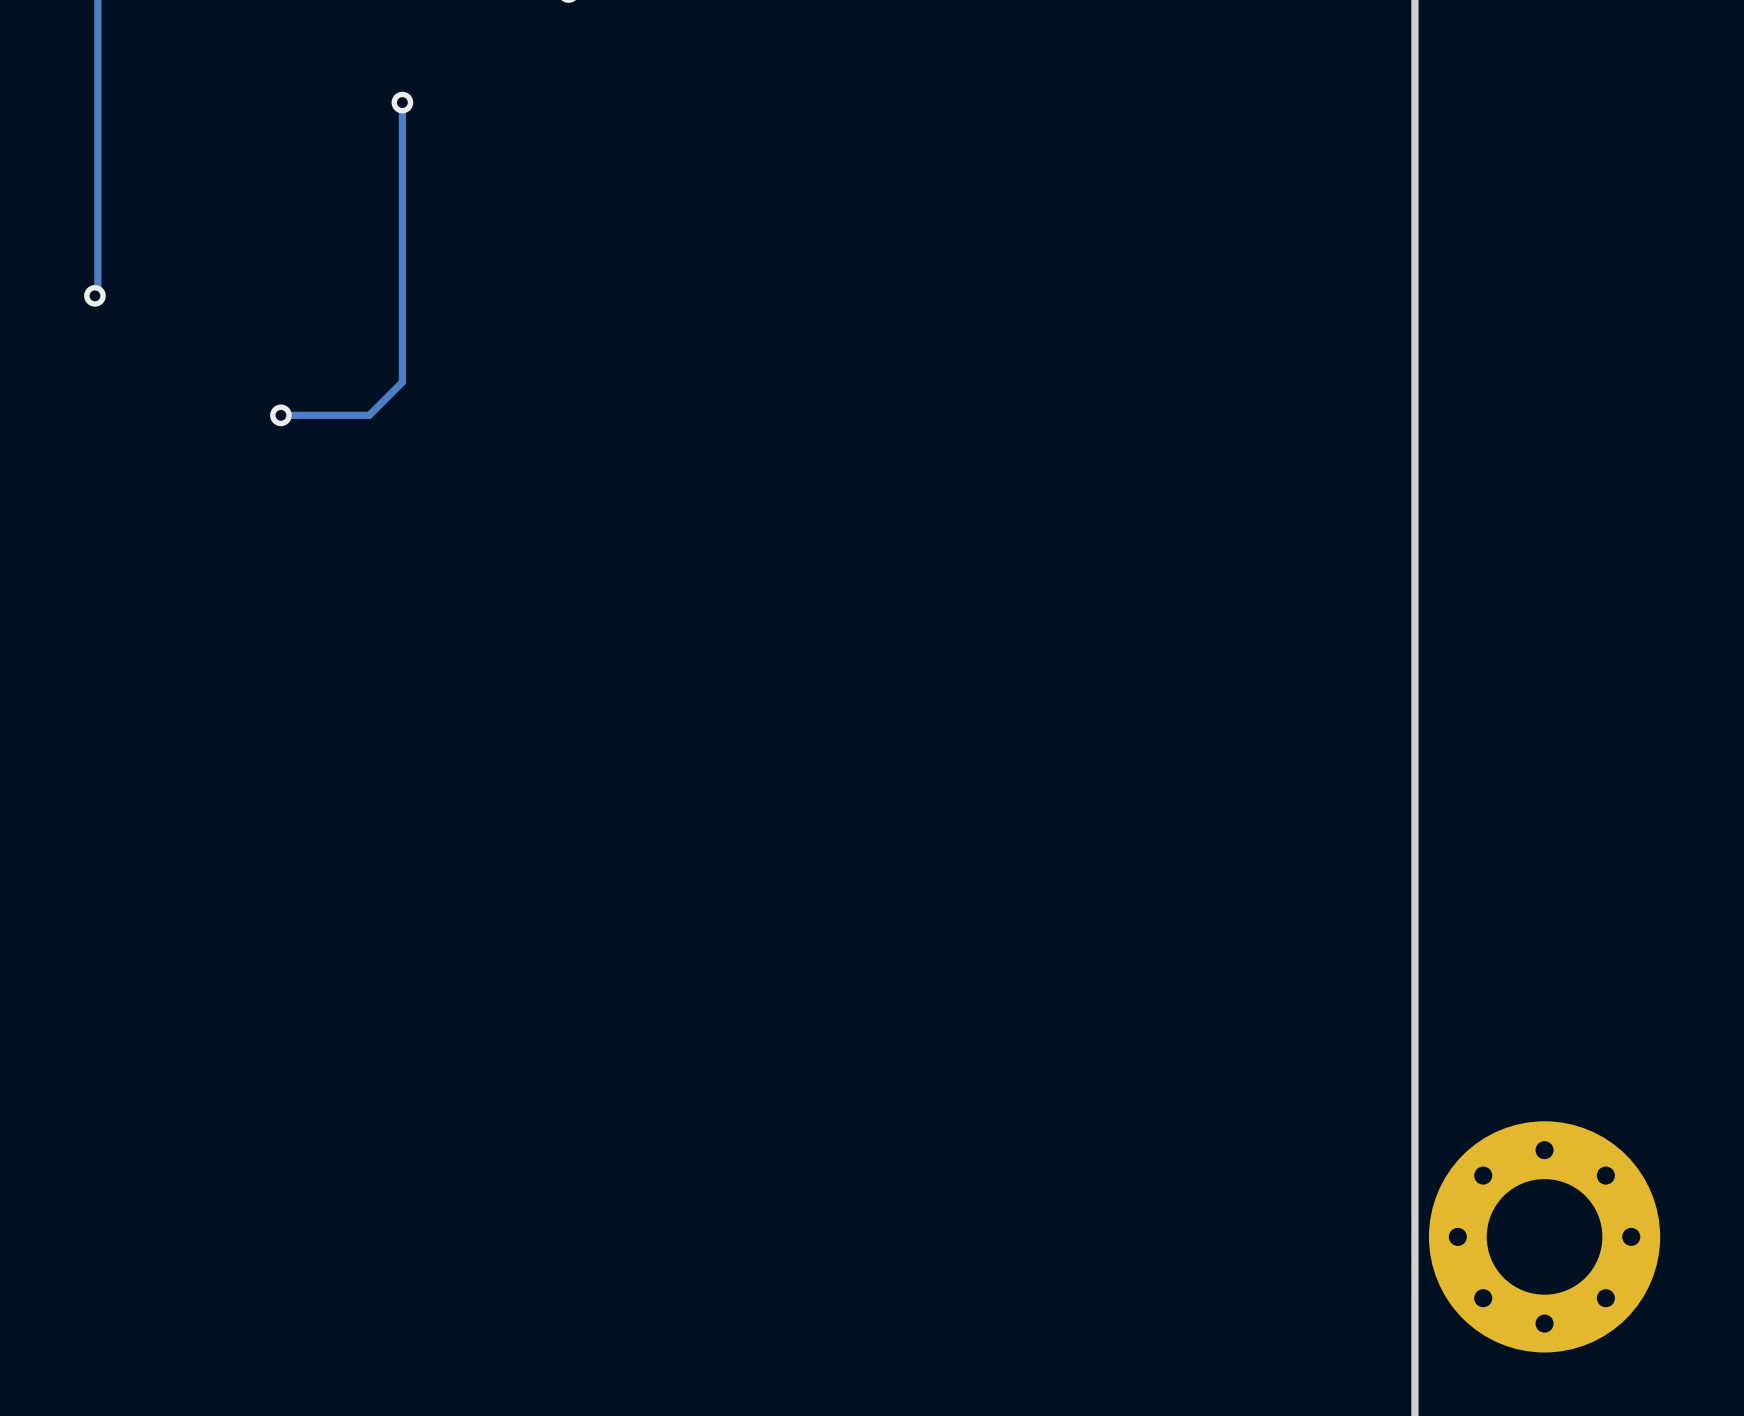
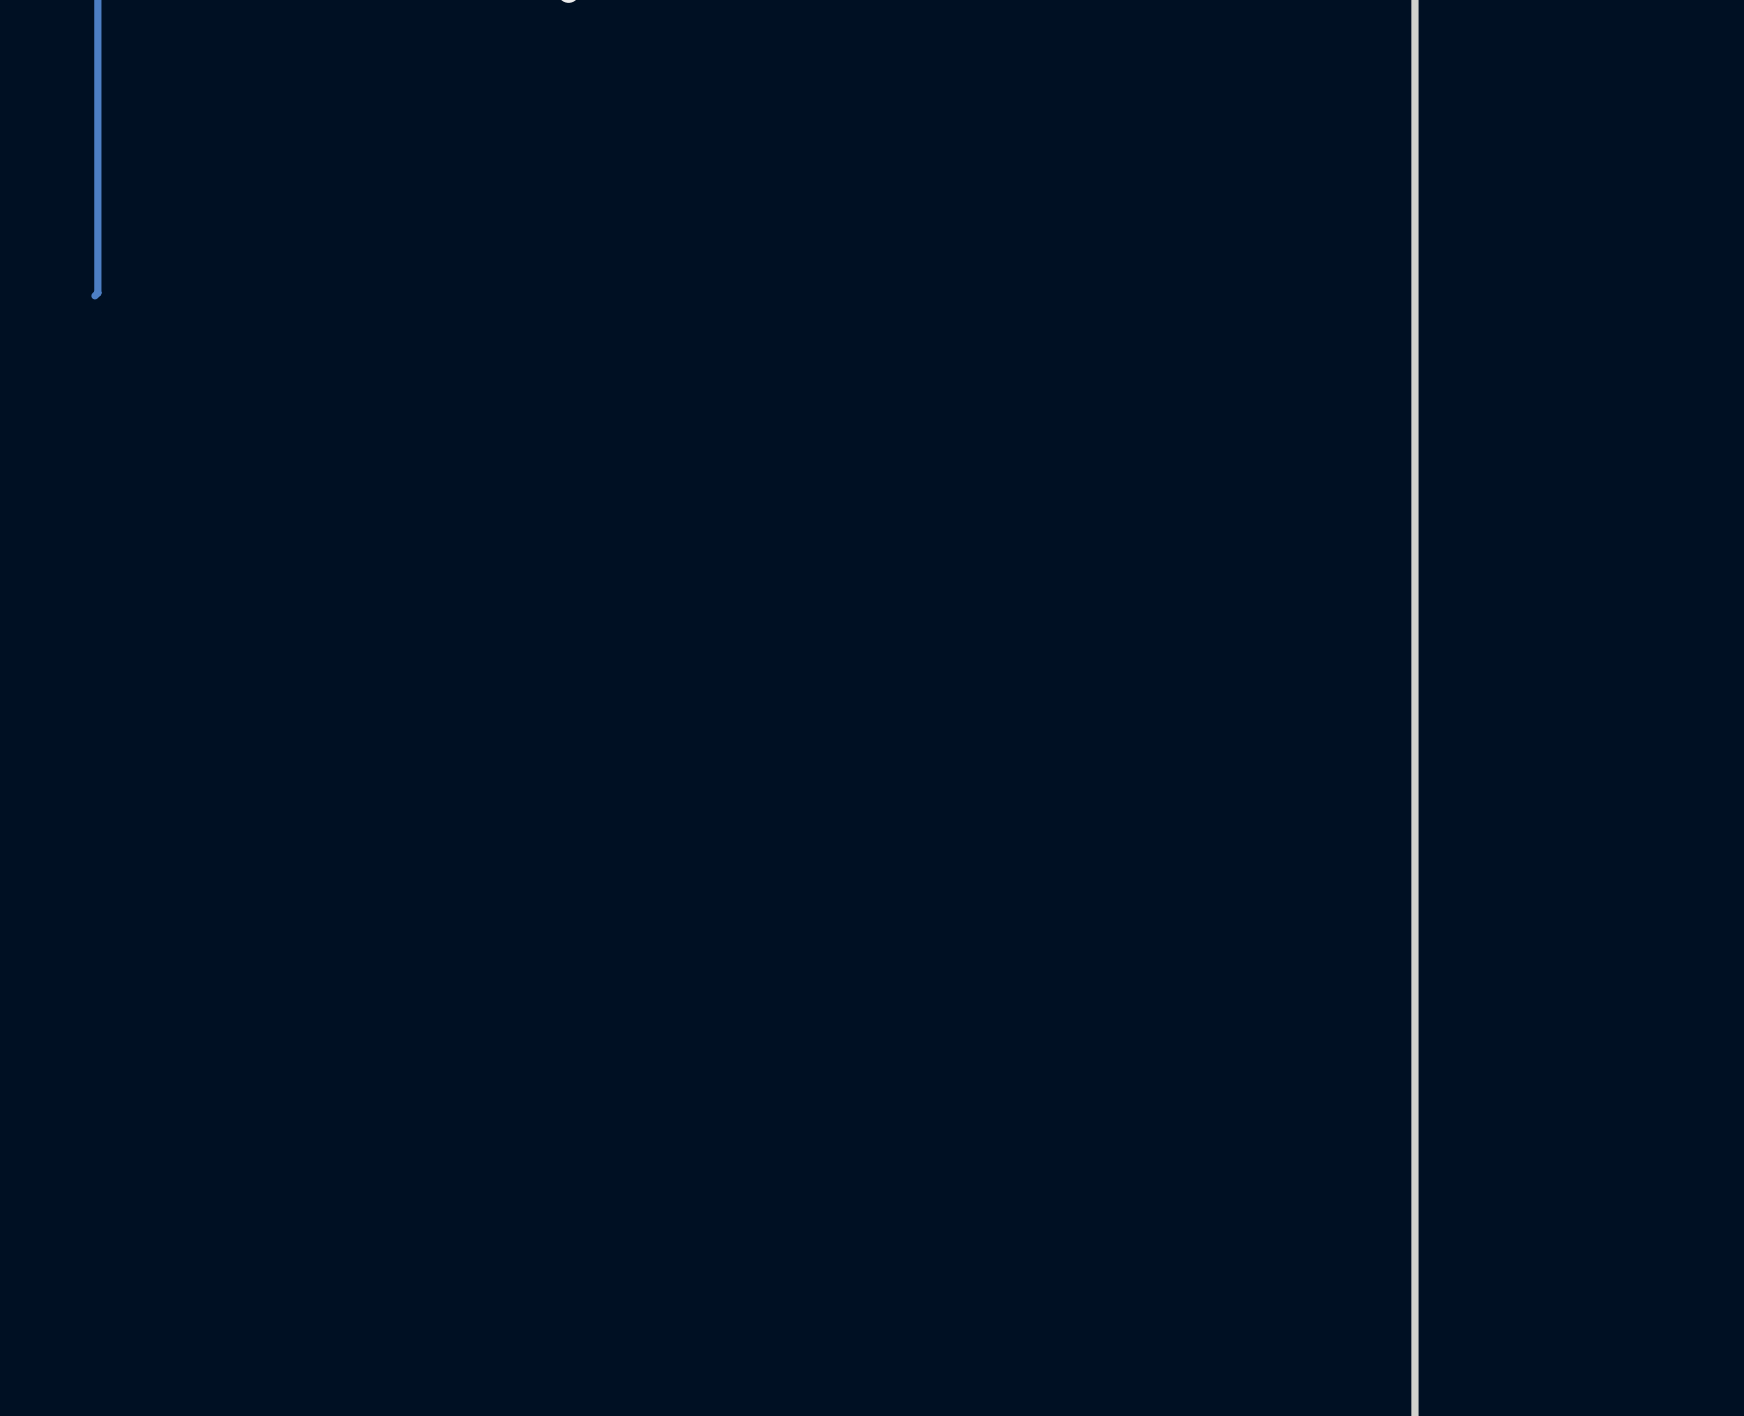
track: (402, 102) (402, 382) (369, 415) (280, 415) -> none
via: (402, 102) -> none
via: (94, 295) -> none
via: (280, 415) -> none
part: (1544, 1236) -> none

